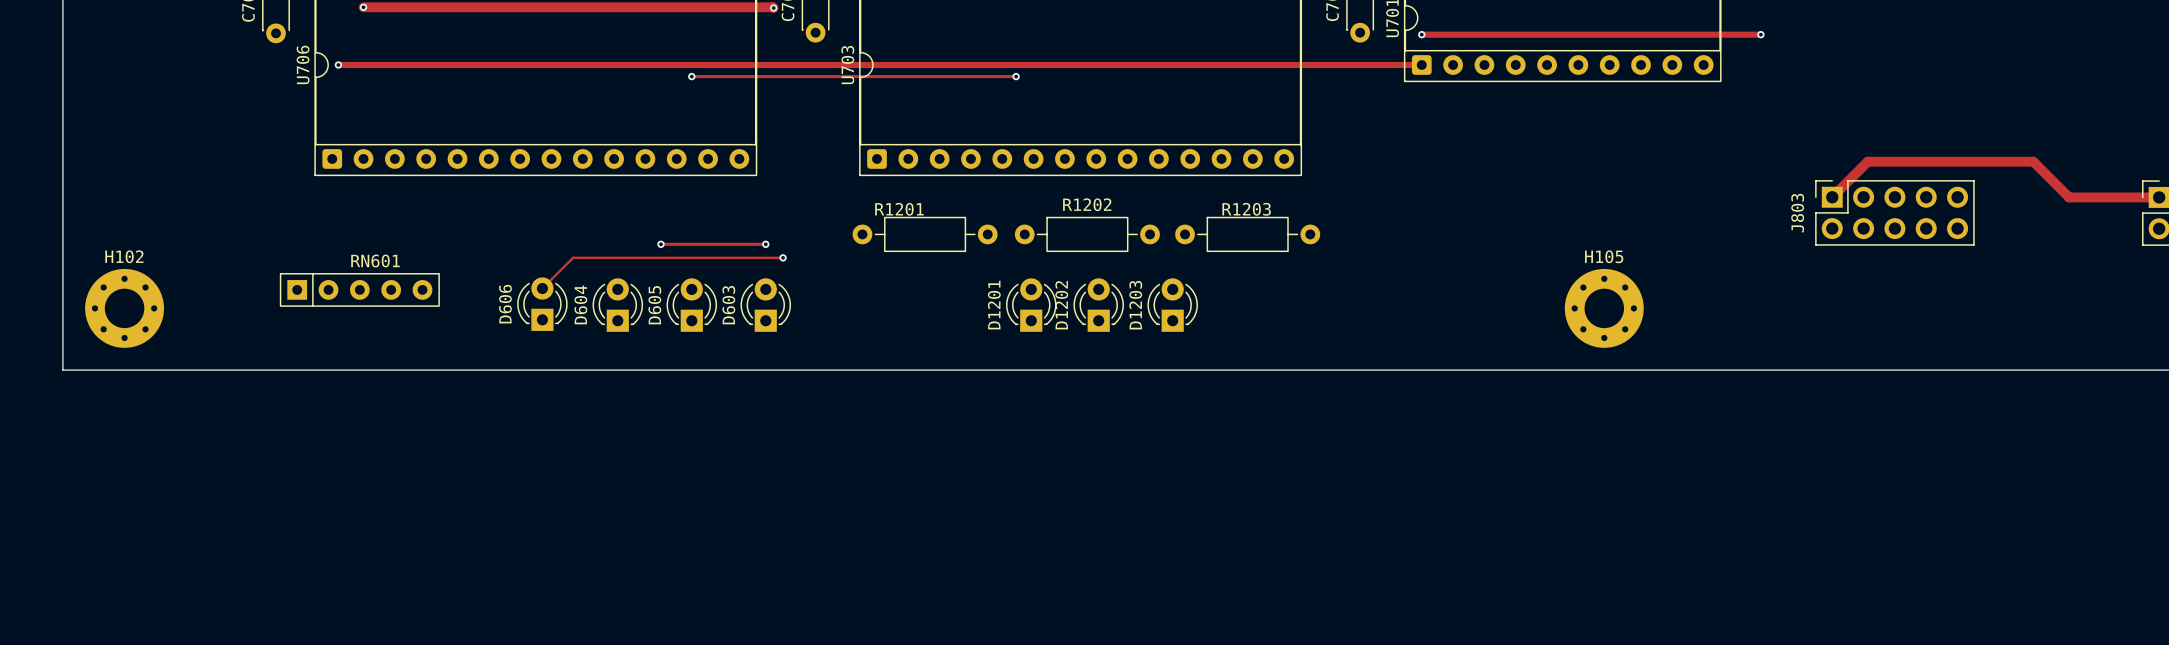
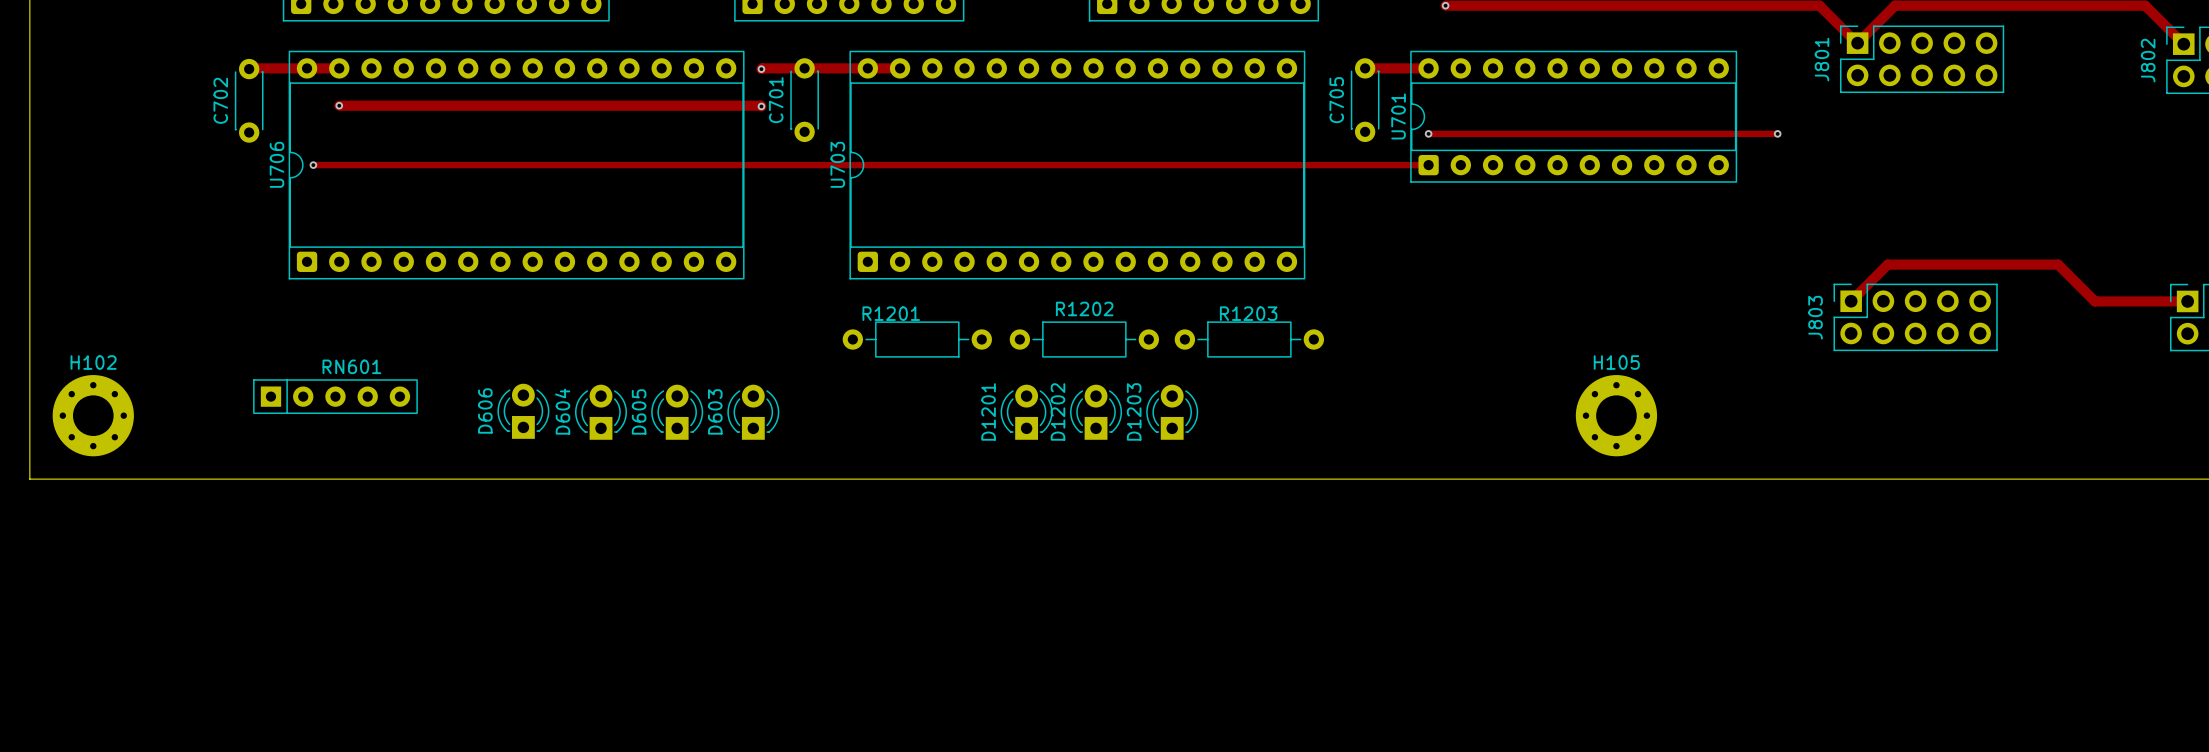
track: (691, 76) (1016, 76) -> none
via: (691, 76) -> none
via: (1016, 76) -> none
track: (660, 244) (765, 244) -> none
via: (660, 244) -> none
via: (765, 244) -> none
track: (783, 257) (573, 257) (542, 288) -> none
via: (783, 257) -> none

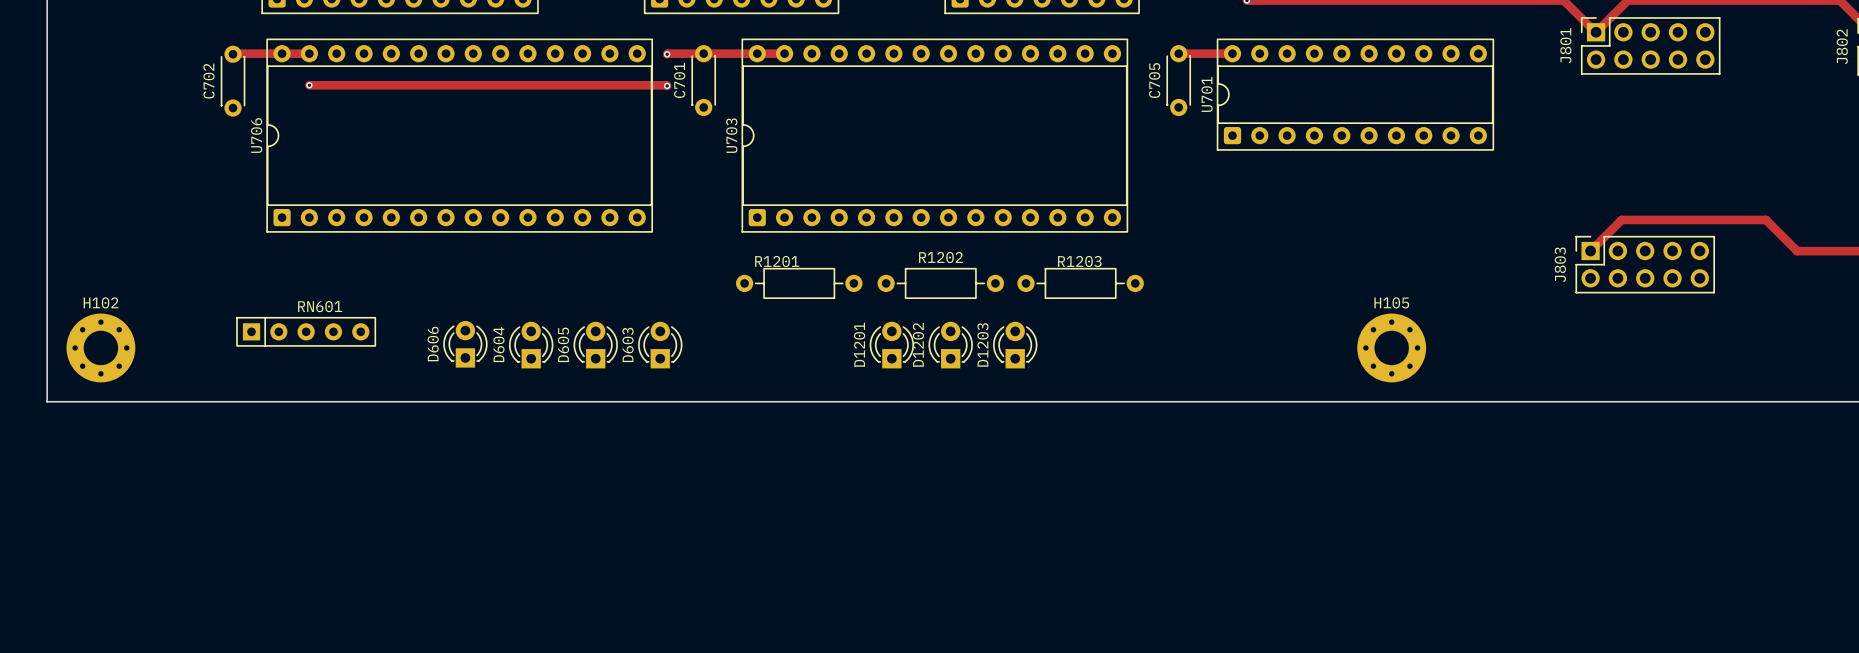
track: (1428, 133) (1777, 133) -> none
via: (1428, 133) -> none
via: (1777, 133) -> none
track: (313, 165) (1428, 165) -> none
via: (313, 165) -> none

